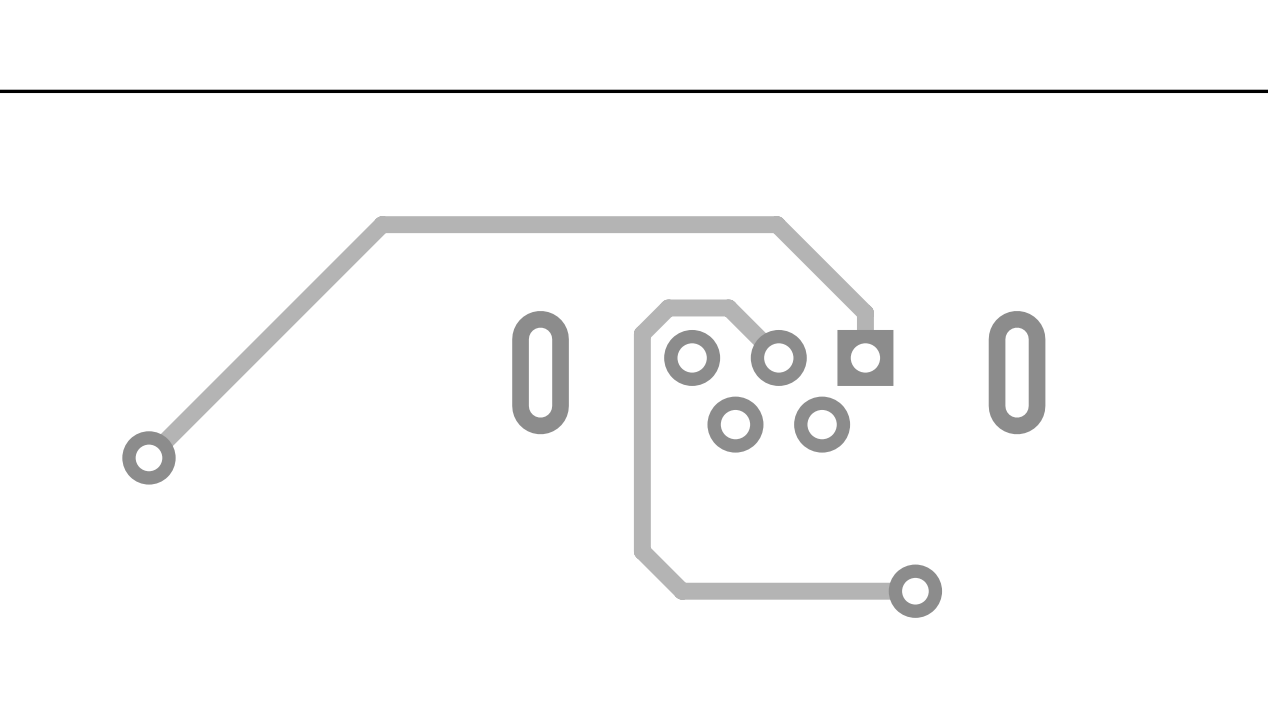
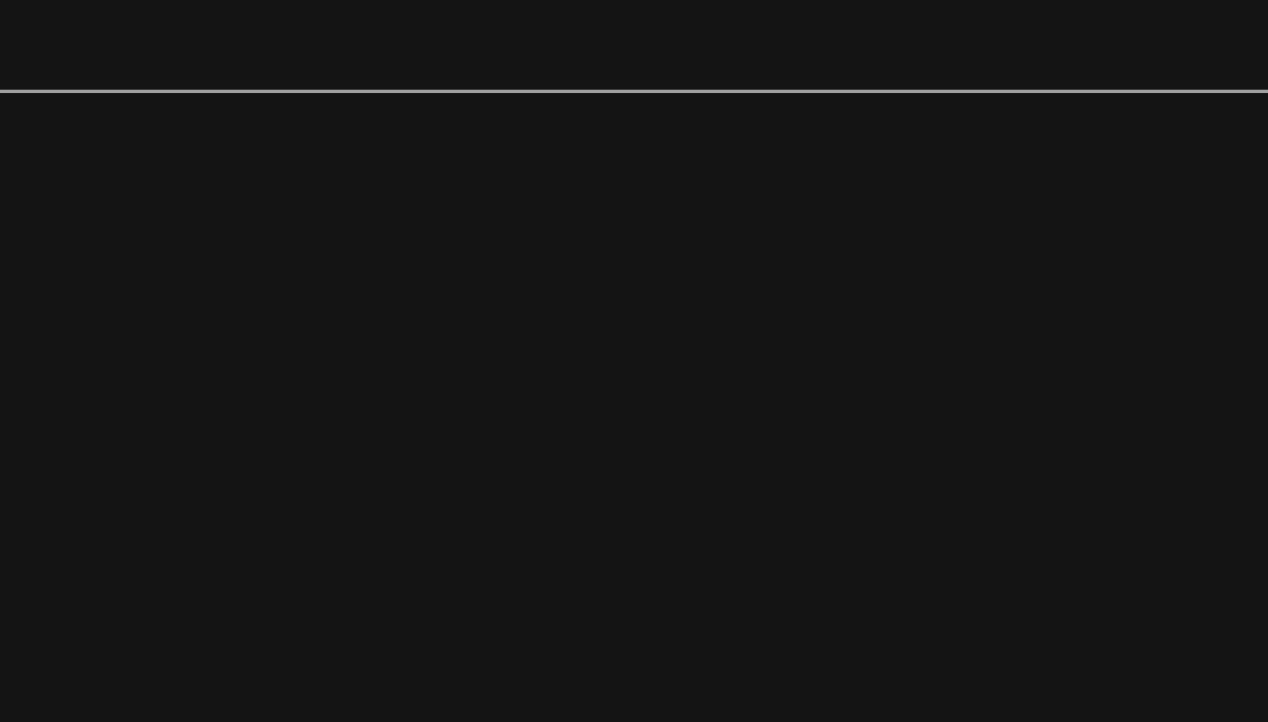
track: (778, 357) (728, 307) (668, 307) (642, 334) (642, 551) (682, 591) (915, 591) -> none
track: (865, 357) (865, 313) (777, 224) (382, 224) (148, 457) -> none
part: (778, 381) -> none
via: (148, 457) -> none
via: (915, 591) -> none

